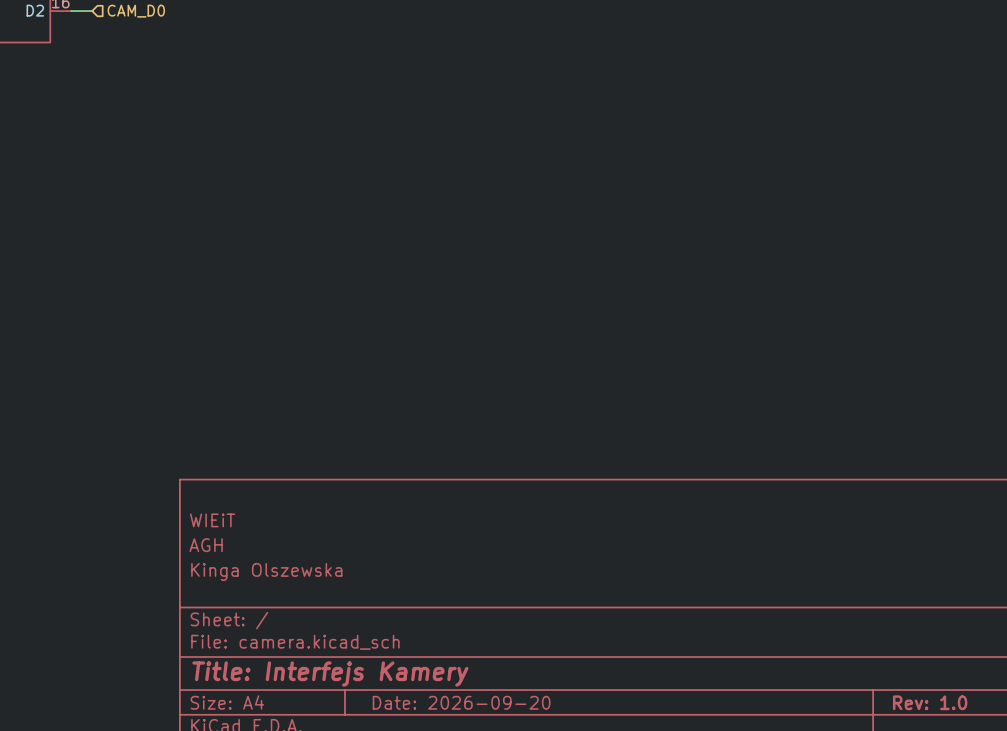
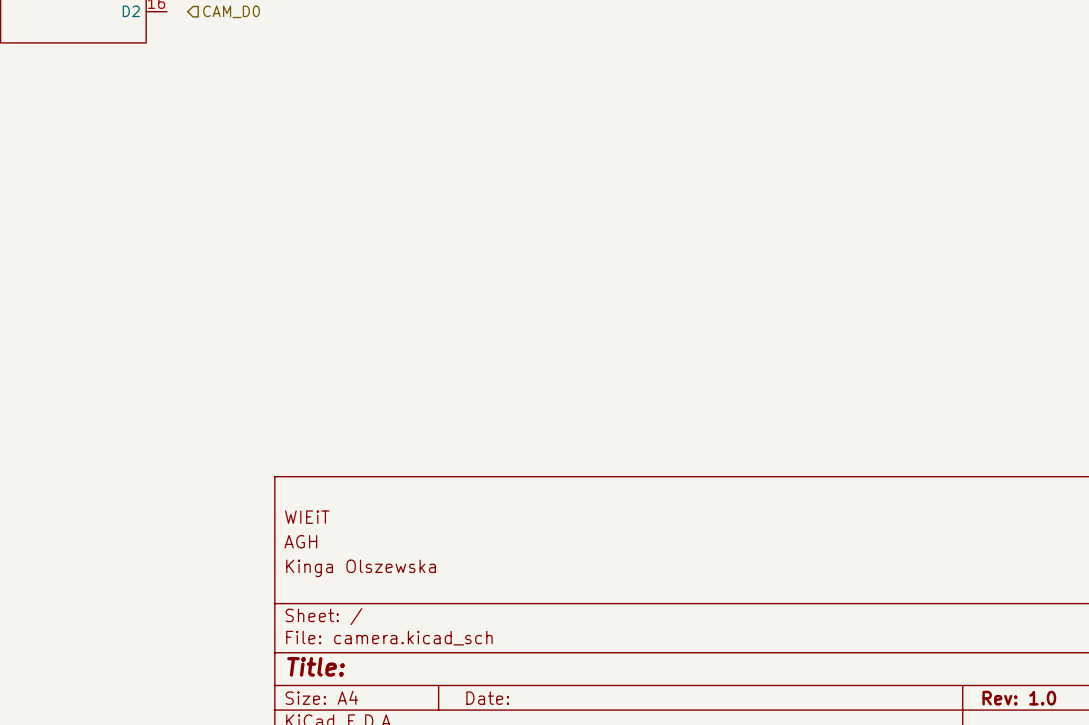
wire: (71, 11) (92, 11) -> none
title block: Title: Interfejs Kamery (330, 674) -> Title: (316, 666)
title block: Date: 2026-09-20 (461, 702) -> Date: (487, 698)

